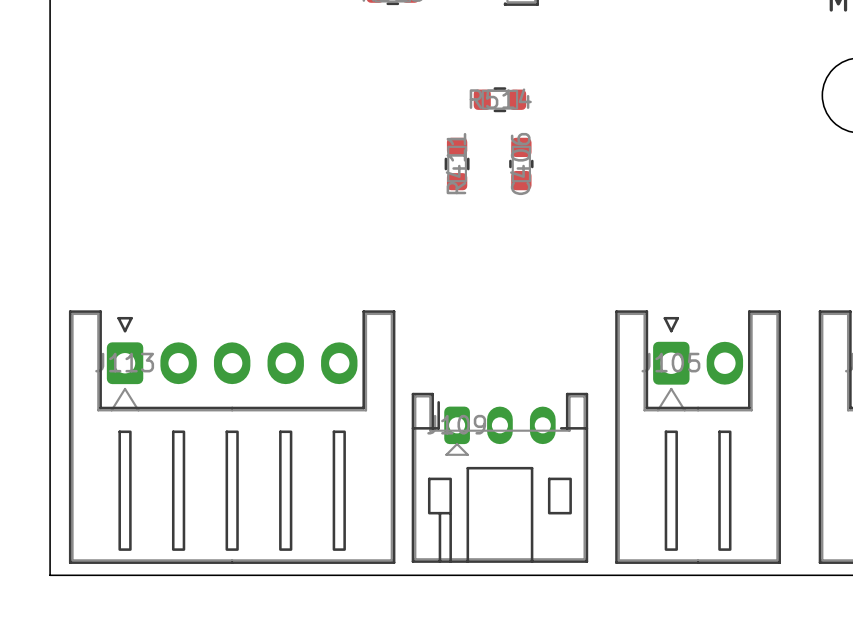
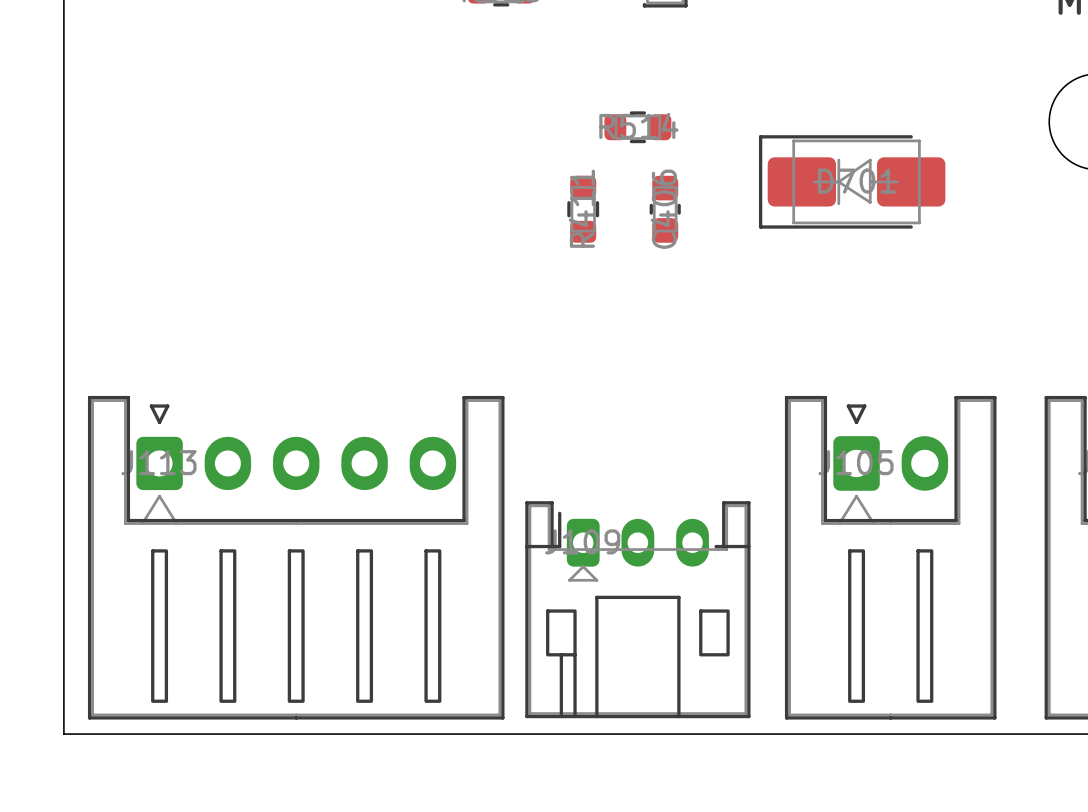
part: none -> (852, 181)

